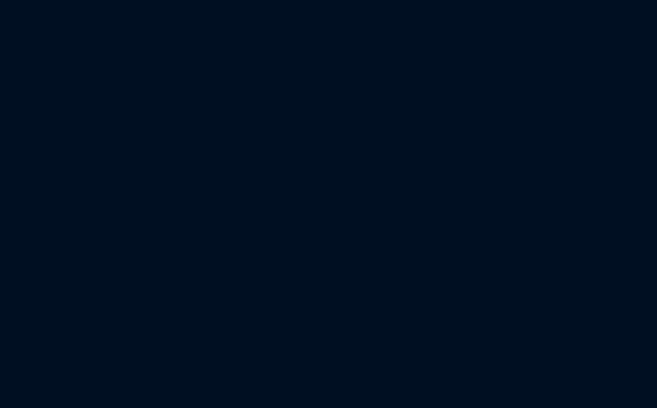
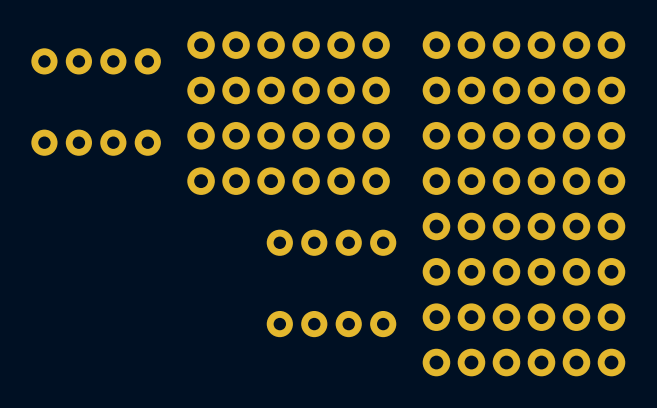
part: none -> (288, 45)
part: none -> (523, 45)
part: none -> (96, 61)
part: none -> (288, 90)
part: none -> (523, 90)
part: none -> (288, 135)
part: none -> (523, 135)
part: none -> (96, 142)
part: none -> (288, 181)
part: none -> (523, 181)
part: none -> (523, 226)
part: none -> (331, 242)
part: none -> (523, 271)
part: none -> (523, 317)
part: none -> (331, 324)
part: none -> (523, 362)

